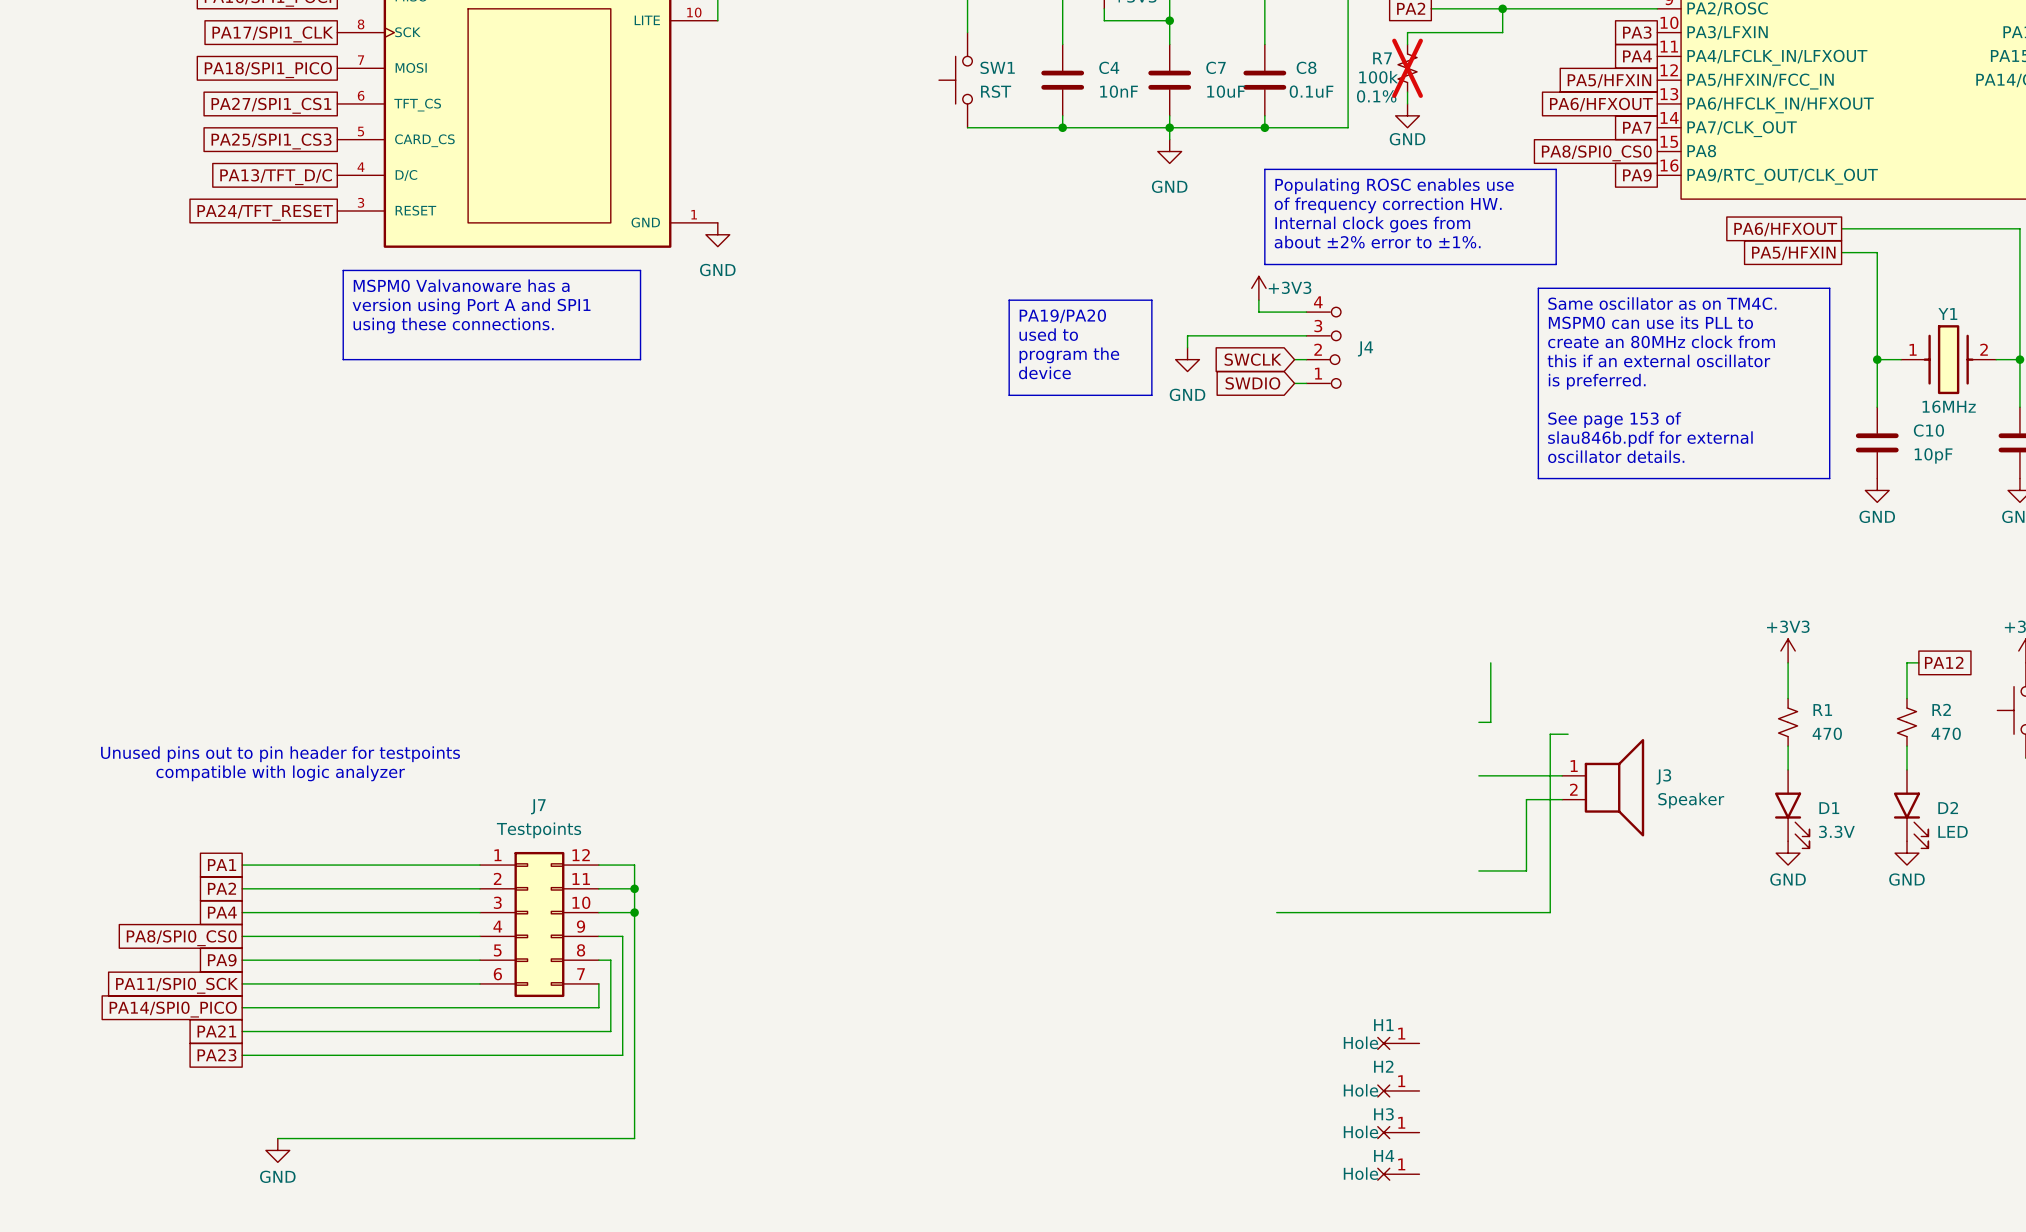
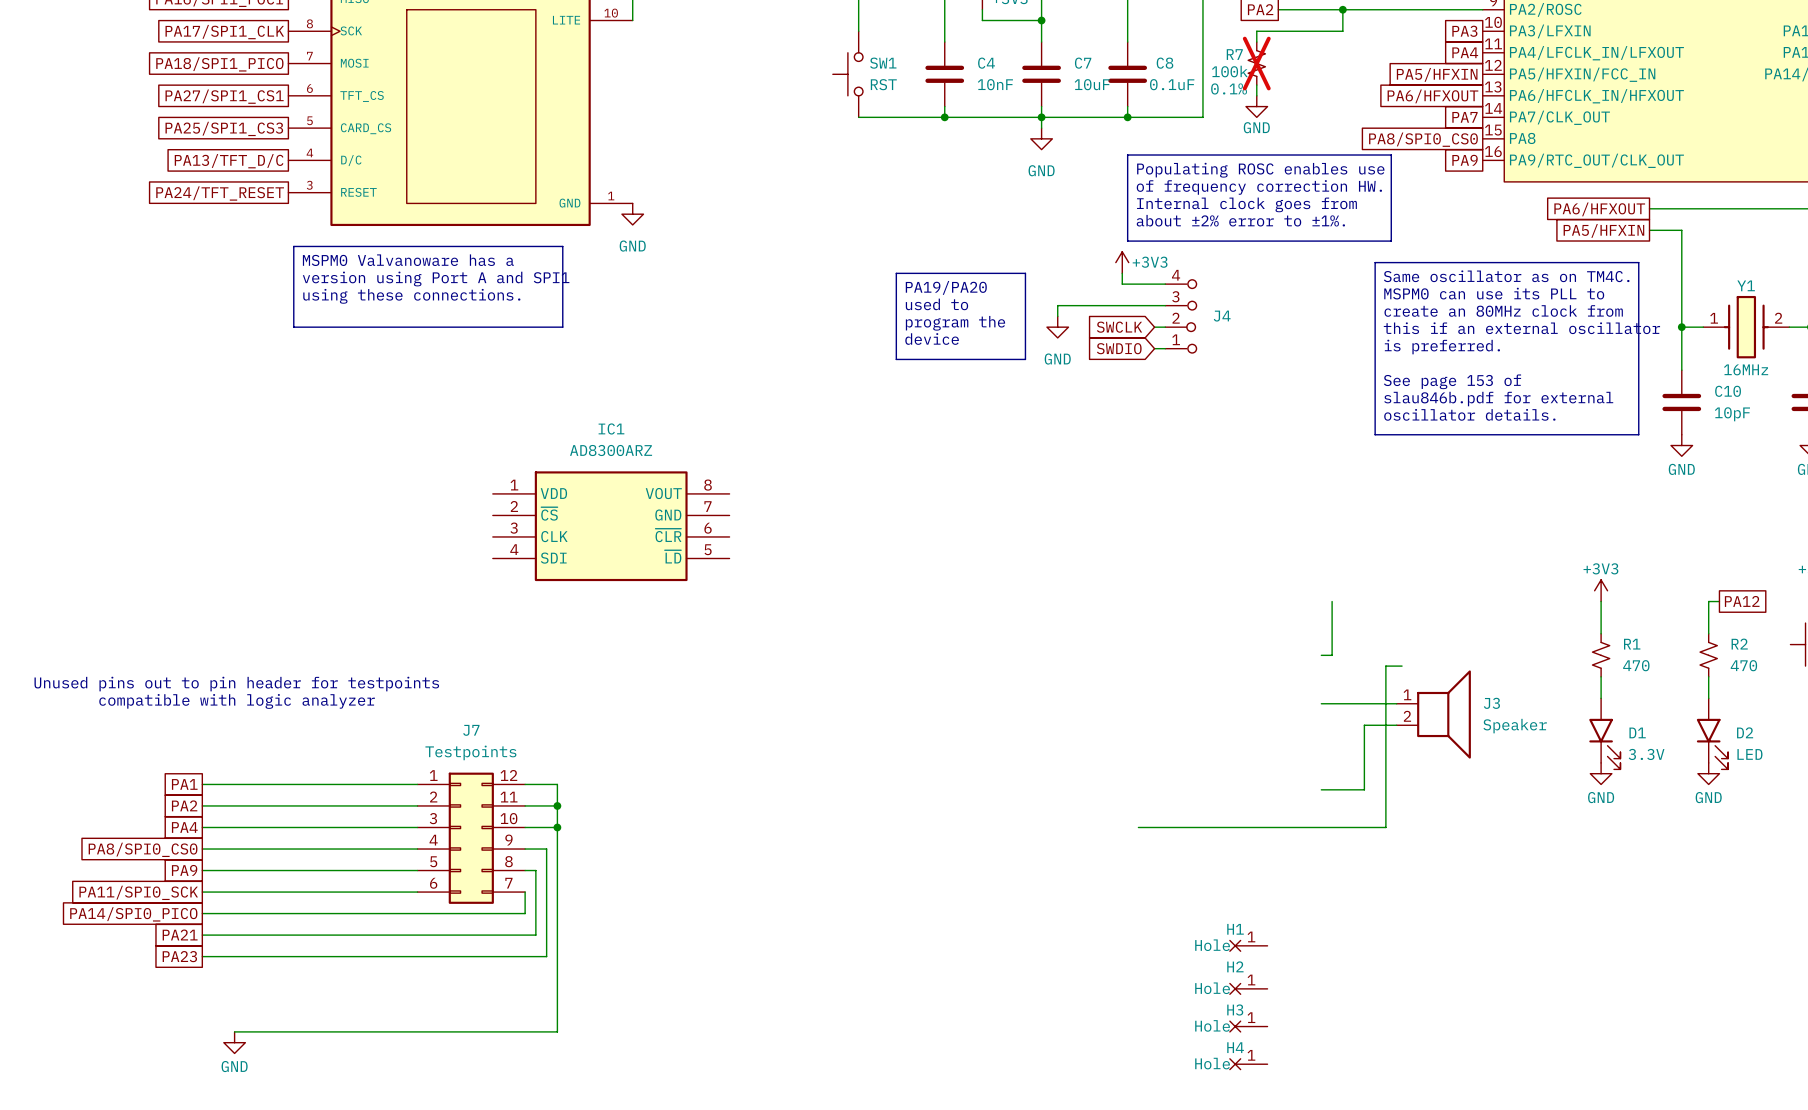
IC1: none -> AD8300ARZ (611, 526)

